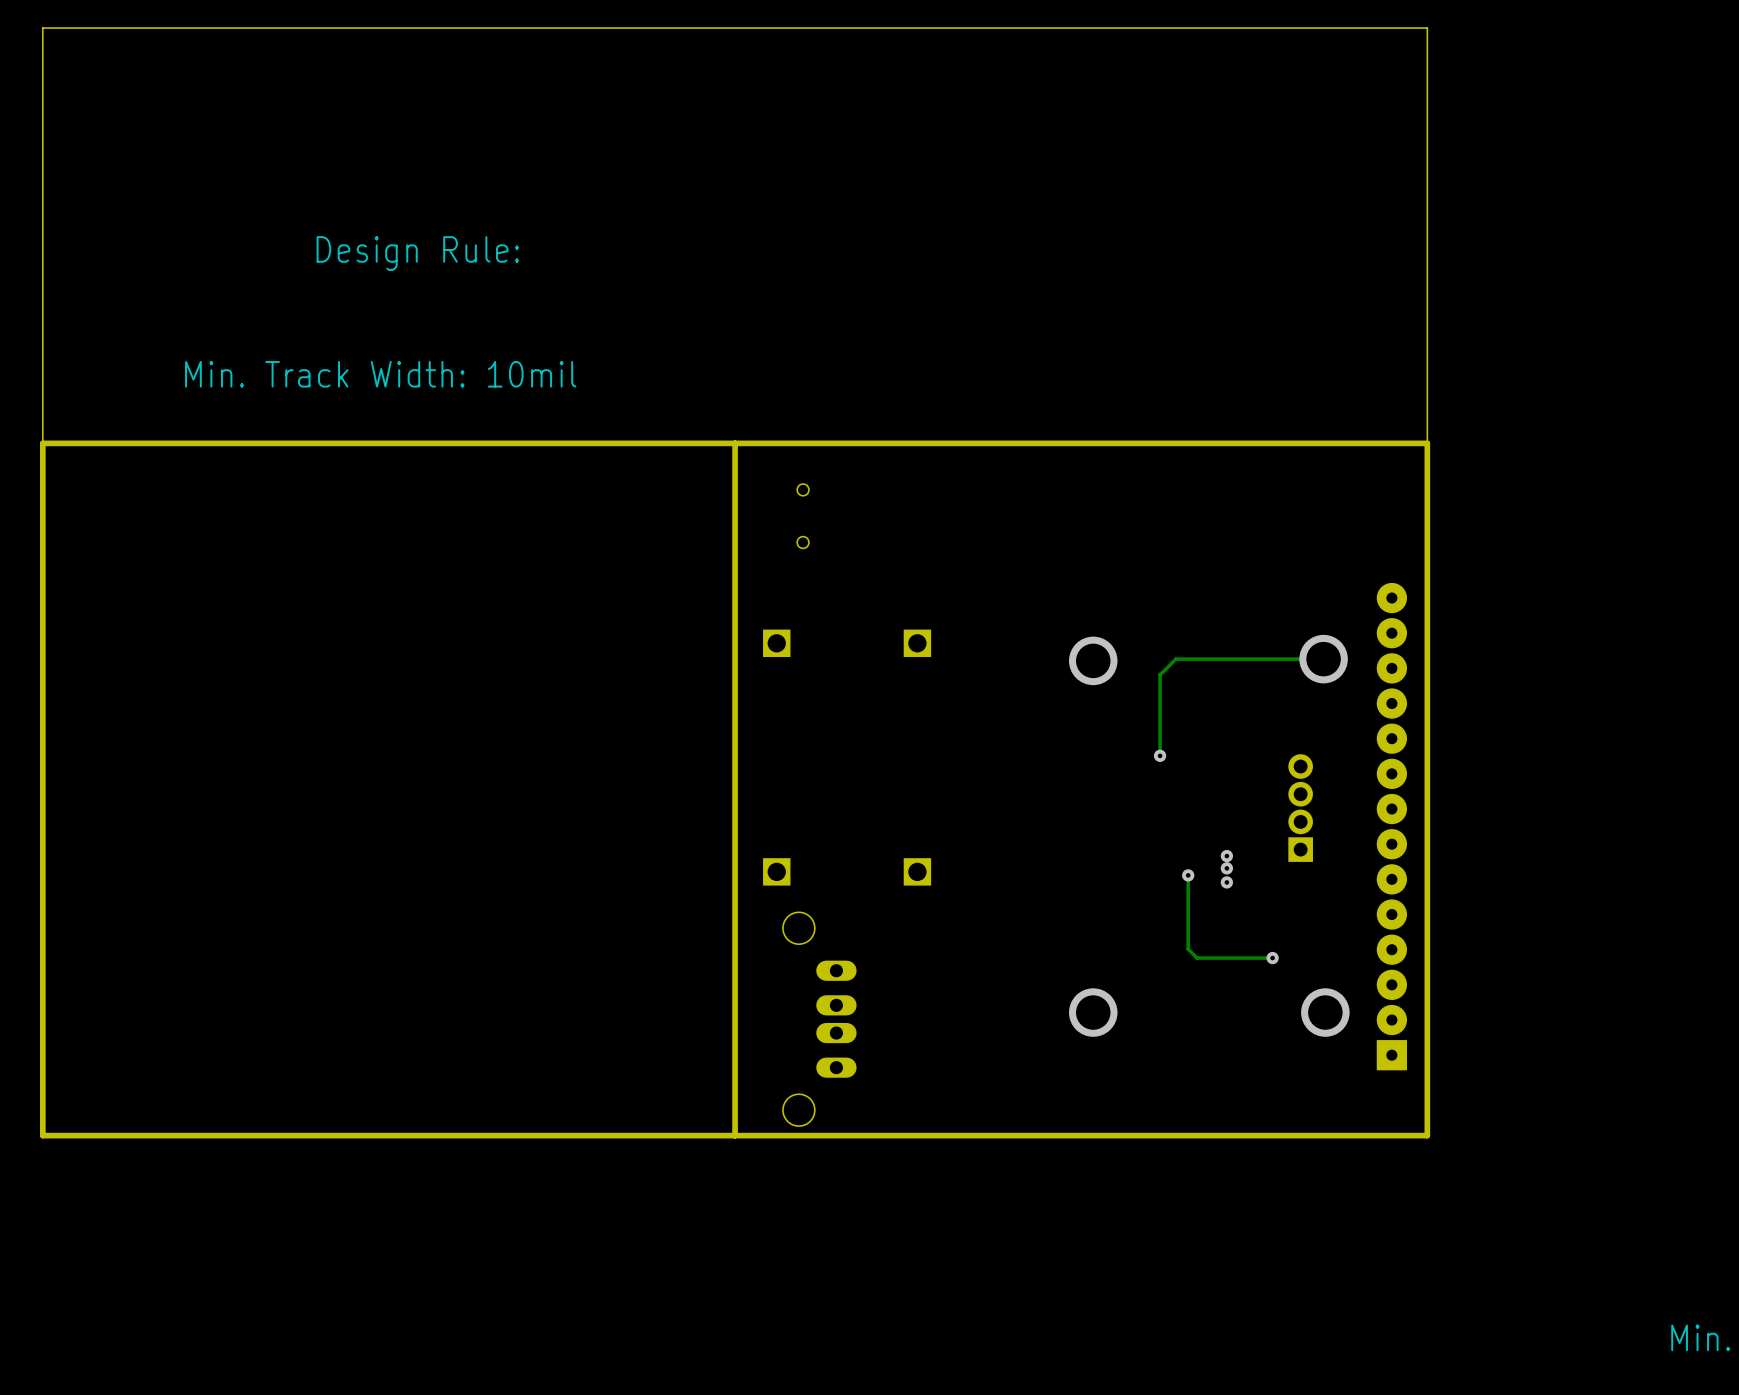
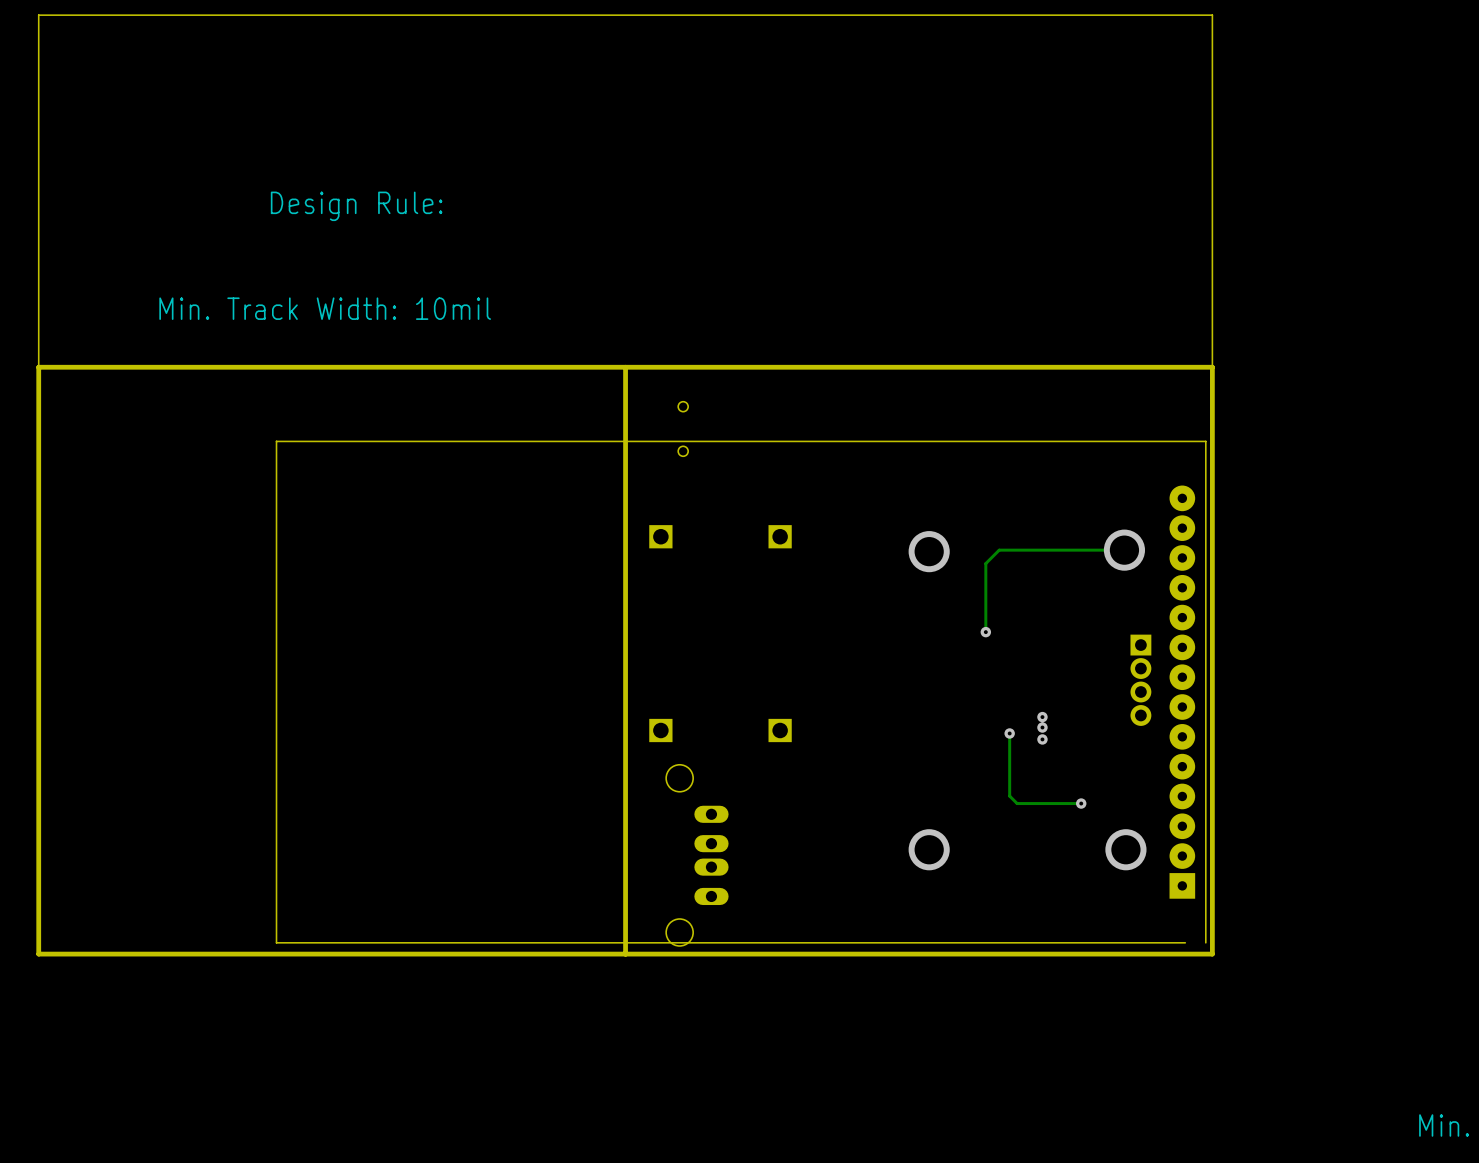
part rotation: 0° (1300, 808) -> 180° (1140, 680)
part: none -> (741, 692)

